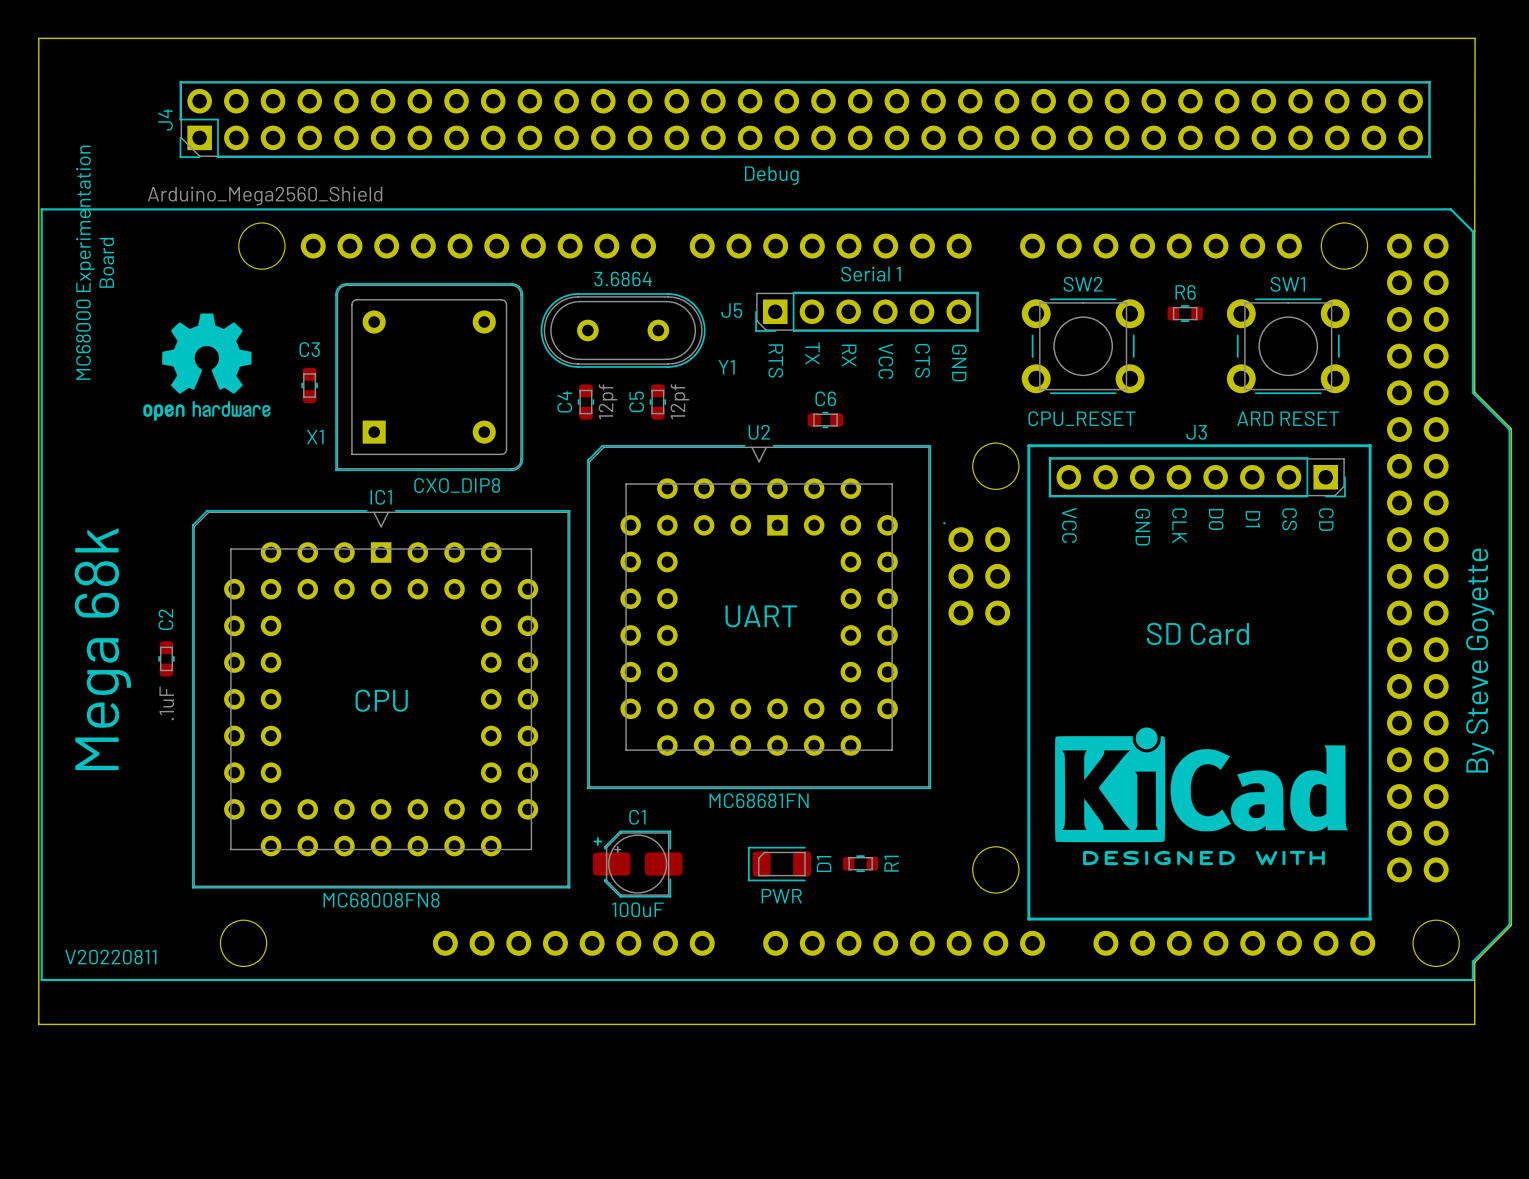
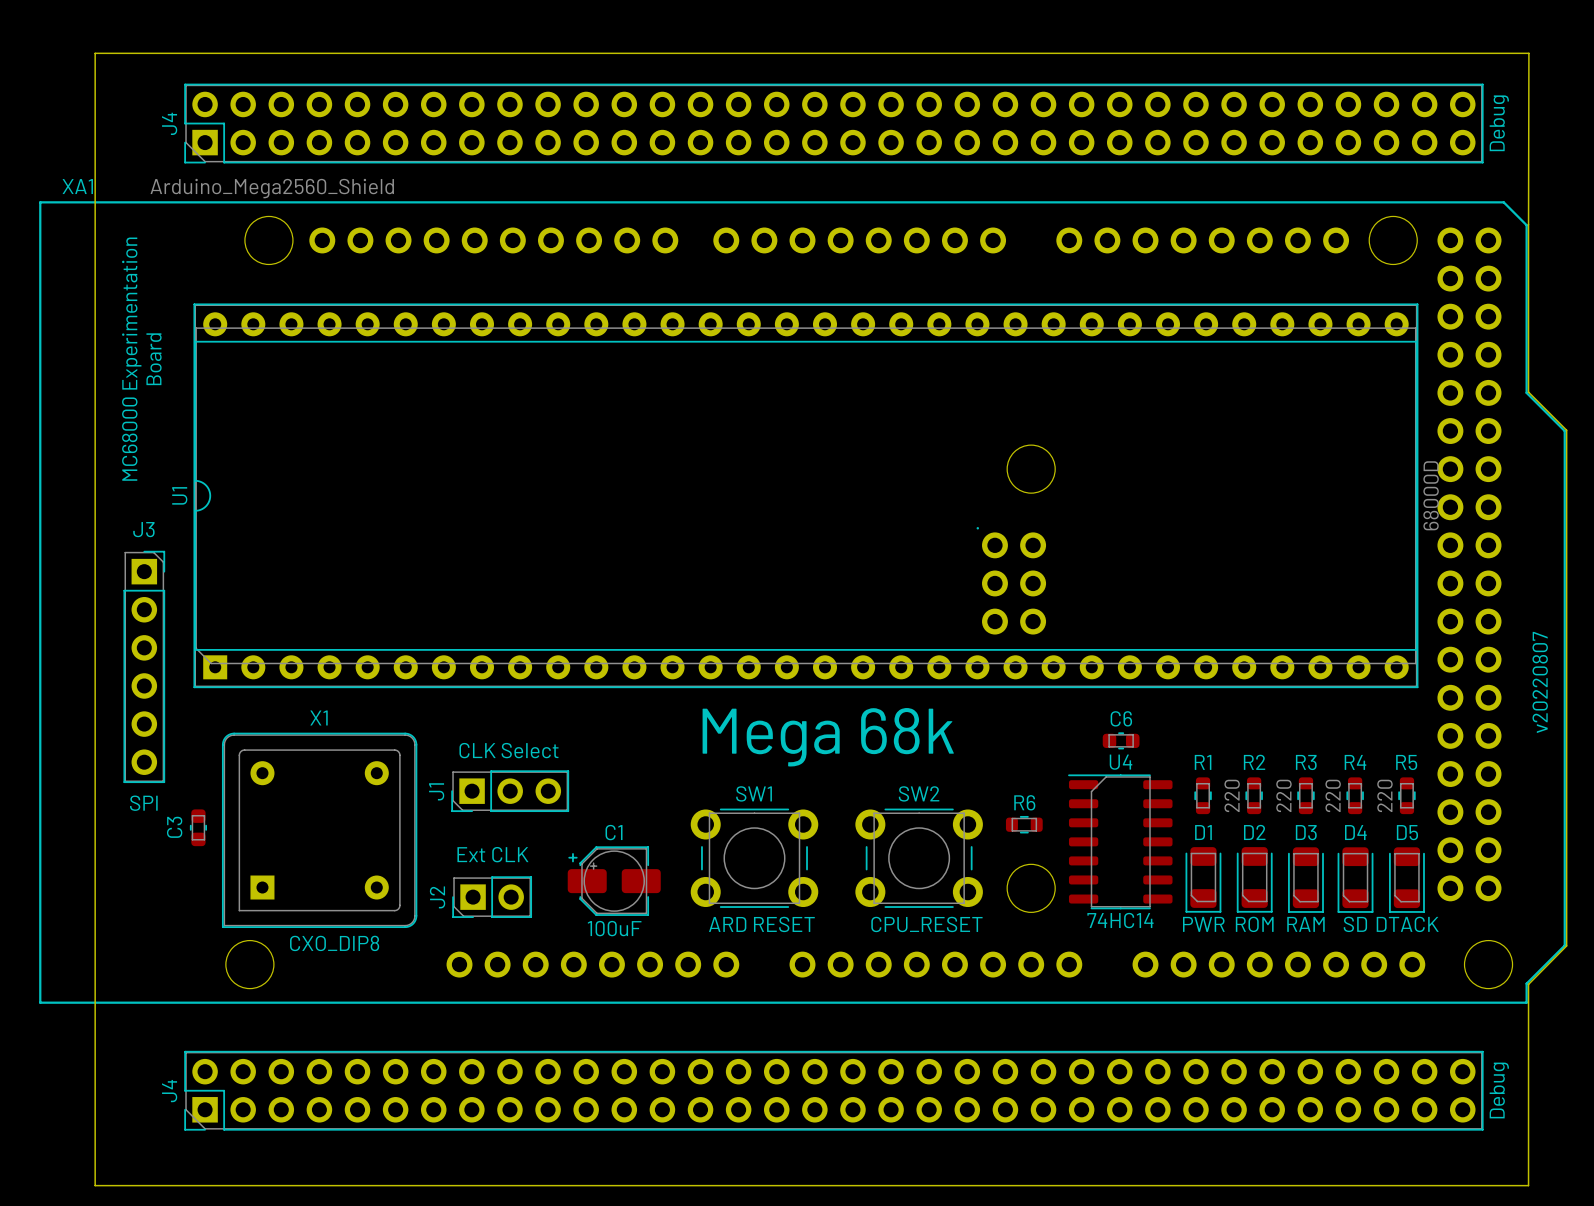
J4 position: (805, 119) -> (833, 123)
J4 value rotation: 0° (771, 175) -> 90° counterclockwise (1499, 123)
J4 value position: Debug (771, 175) -> Debug (1499, 123)
XA1 name: none -> XA1 (77, 186)
board edge: (1474, 230) (1475, 38) (38, 38) (38, 1024) (1474, 1024) -> (1528, 224) (1528, 53) (95, 53) (95, 1185) (1528, 1185) (1528, 1048)
text position: MC68000 Experimentation (85, 262) -> MC68000 Experimentation (131, 359)
text position: Board (106, 262) -> Board (154, 359)
J5: Serial 1 (867, 311) -> none
drawing: [143, 313, 271, 422] -> none
R6 position: (1185, 313) -> (1024, 824)
Y1: 3.6864 (623, 330) -> none
SW2 position: (1083, 346) -> (919, 858)
SW1 position: (1288, 346) -> (754, 858)
C3 name rotation: 0° (309, 349) -> 90° counterclockwise (174, 827)
C3 name position: C3 (309, 349) -> C3 (174, 827)
text: TX (812, 353) -> none
text: RX (849, 355) -> none
text: RTS (775, 360) -> none
text: CTS (922, 360) -> none
text: VCC (885, 361) -> none
text: GND (959, 363) -> none
X1 position: (429, 377) -> (319, 830)
C3 position: (309, 385) -> (198, 827)
C4: 12pf (585, 402) -> none
C5: 12pf (657, 402) -> none
SW2 value position: CPU_RESET (1081, 418) -> CPU_RESET (926, 924)
SW1 value position: ARD RESET (1288, 418) -> ARD RESET (761, 924)
C6 position: (825, 420) -> (1121, 740)
J3 name position: J3 (1196, 432) -> J3 (143, 529)
X1 name position: X1 (315, 437) -> X1 (319, 718)
line: (1028, 445) (1370, 445) (1370, 919) (1028, 919) (1028, 445) -> none
J3 footprint: [1048, 457, 1346, 498] -> [123, 550, 166, 784]
X1 value position: CXO_DIP8 (457, 485) -> CXO_DIP8 (334, 943)
U1: none -> 68000D (805, 495)
text: D0 (1216, 519) -> none
text: D1 (1252, 519) -> none
text: CS (1289, 519) -> none
text: CD (1326, 519) -> none
text: VCC (1069, 525) -> none
text: CLK (1179, 525) -> none
text: GND (1142, 527) -> none
text: UART (761, 616) -> none
U2: MC68681FN (759, 617) -> none
text: SD Card (1197, 633) -> none
text: Mega 68k (102, 649) -> none
C2: .1uF (166, 658) -> none
text: By Steve Goyette (1480, 660) -> v20220807 (1540, 682)
IC1: MC68008FN8 (381, 699) -> none
text: CPU (381, 700) -> none
text: none -> Mega 68k (828, 737)
drawing: [1054, 727, 1348, 866] -> none
J1: none -> CLK Select (510, 791)
R2: none -> 220 (1254, 795)
R3: none -> 220 (1305, 795)
R4: none -> 220 (1355, 795)
R5: none -> 220 (1406, 795)
J3 value: none -> SPI (143, 803)
U4: none -> 74HC14 (1120, 841)
D2: none -> ROM (1254, 879)
D3: none -> RAM (1305, 880)
D4: none -> SD (1355, 880)
D5: none -> DTACK (1406, 880)
R1 rotation: 0° (860, 863) -> 90° clockwise (1203, 795)
R1 position: (860, 863) -> (1203, 795)
R1 name position: R1 (891, 863) -> R1 (1203, 762)
C1 position: (637, 864) -> (614, 881)
D1 rotation: 0° (779, 864) -> 90° counterclockwise (1203, 879)
D1 position: (779, 864) -> (1203, 879)
J2: none -> Ext CLK (492, 897)
text: V20220811 (110, 957) -> none
J4: none -> Debug (833, 1090)

